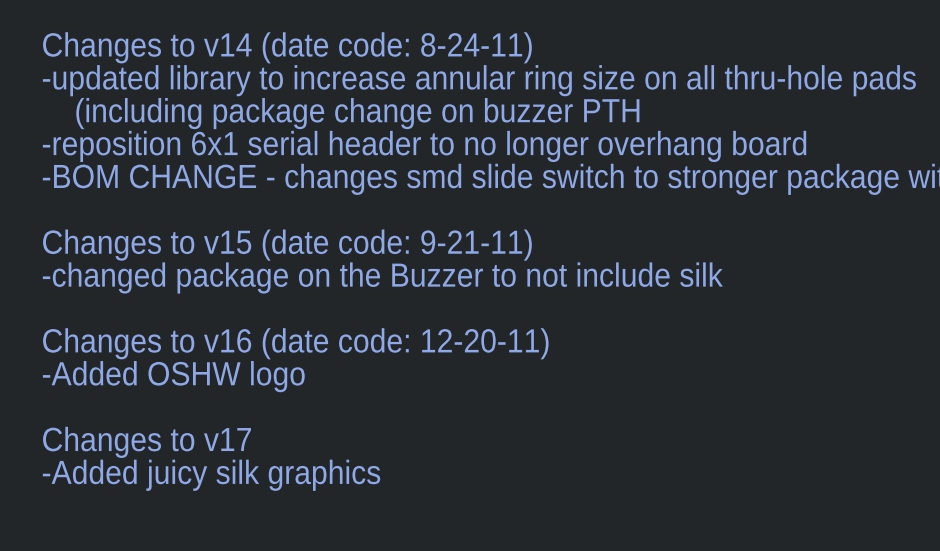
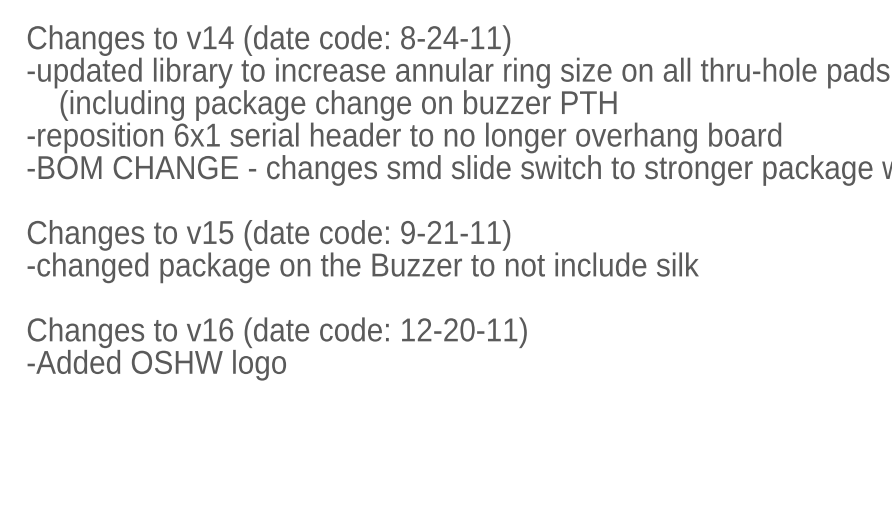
text: Changes to v17 (147, 442) -> none
text: -Added juicy silk graphics (211, 475) -> none

